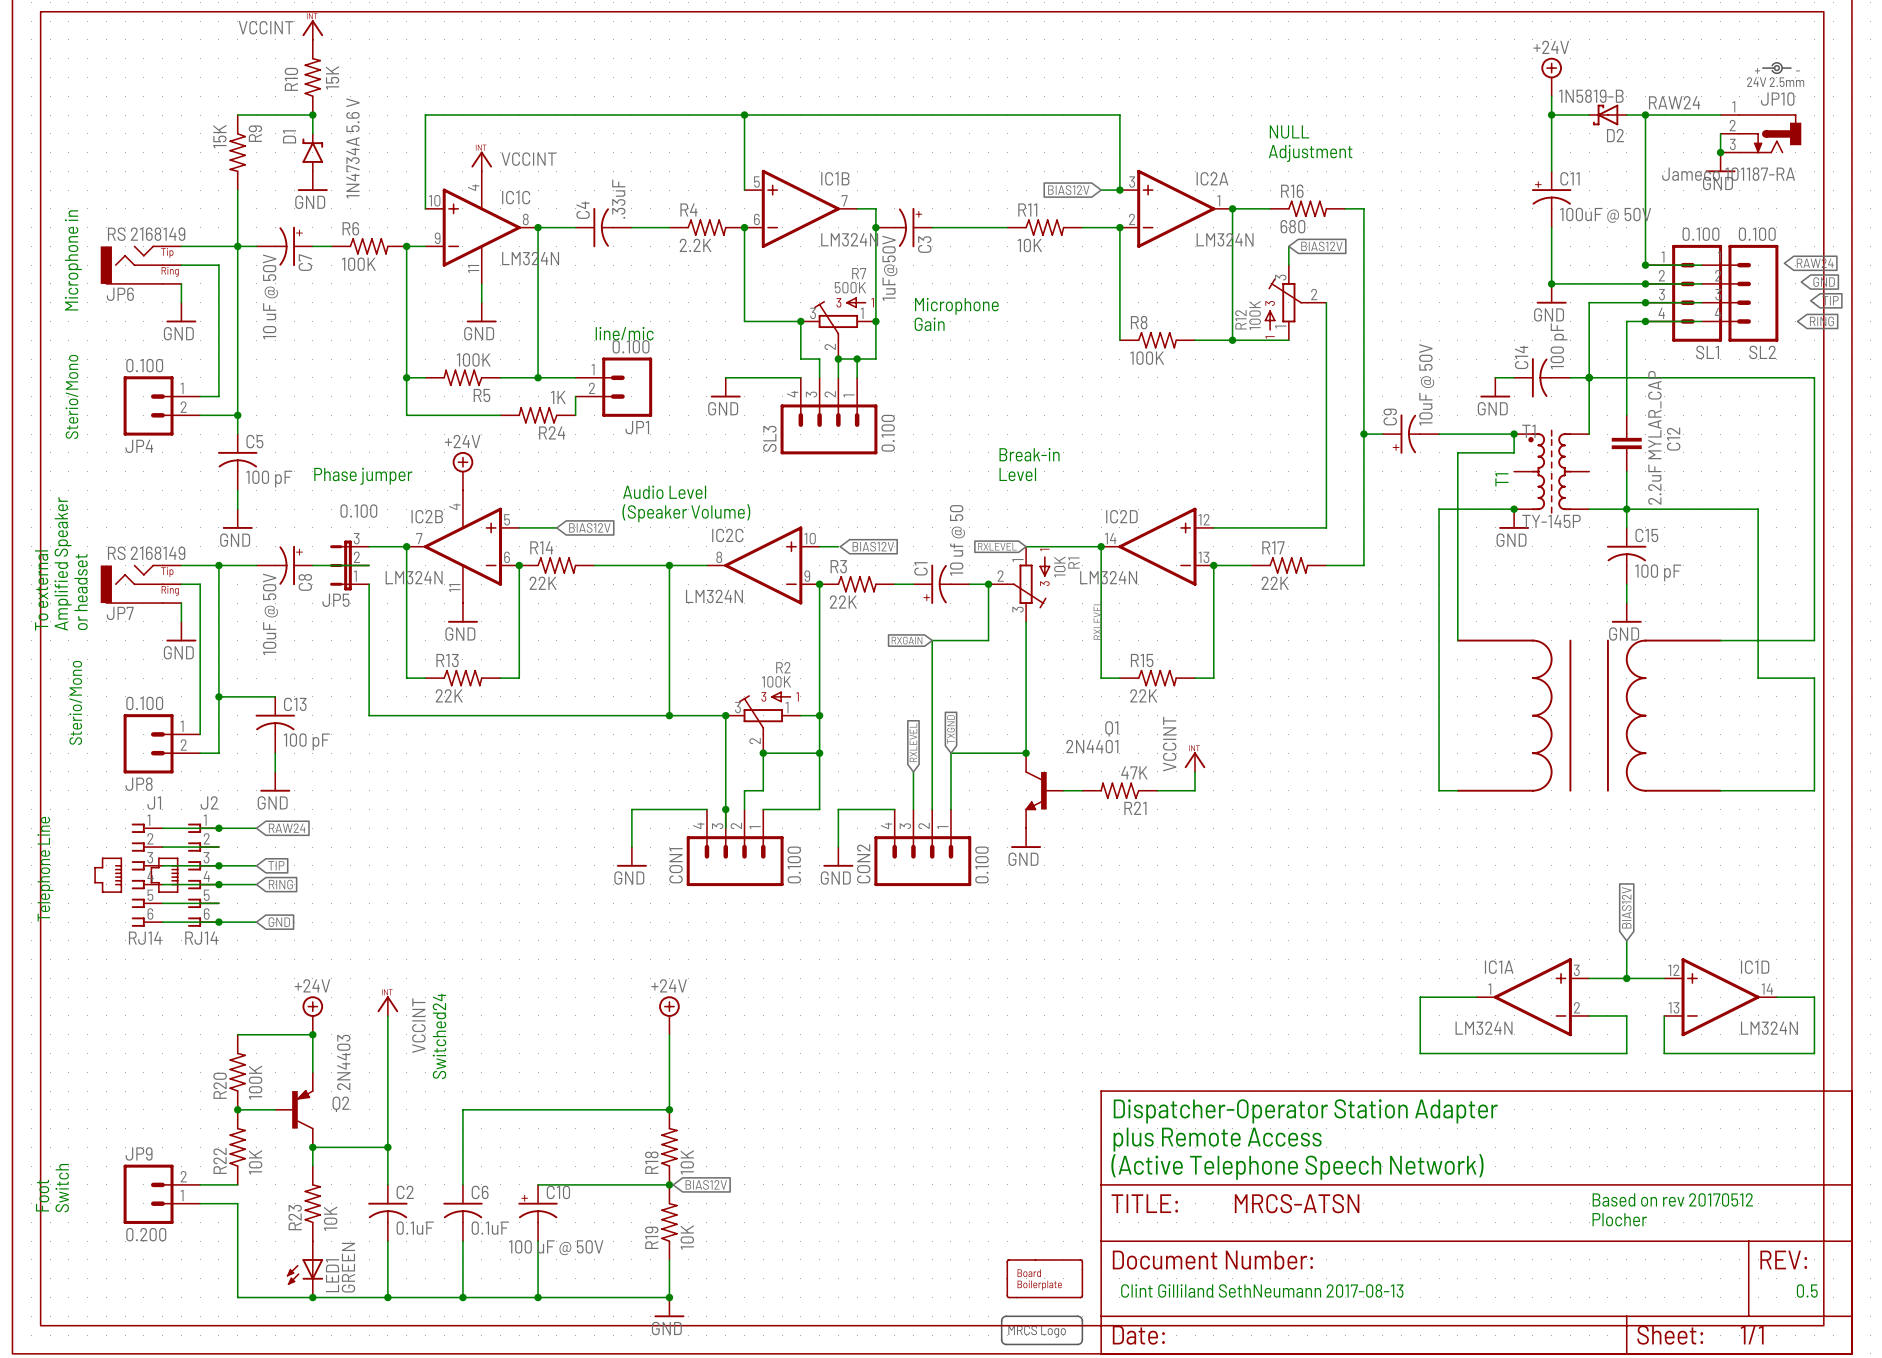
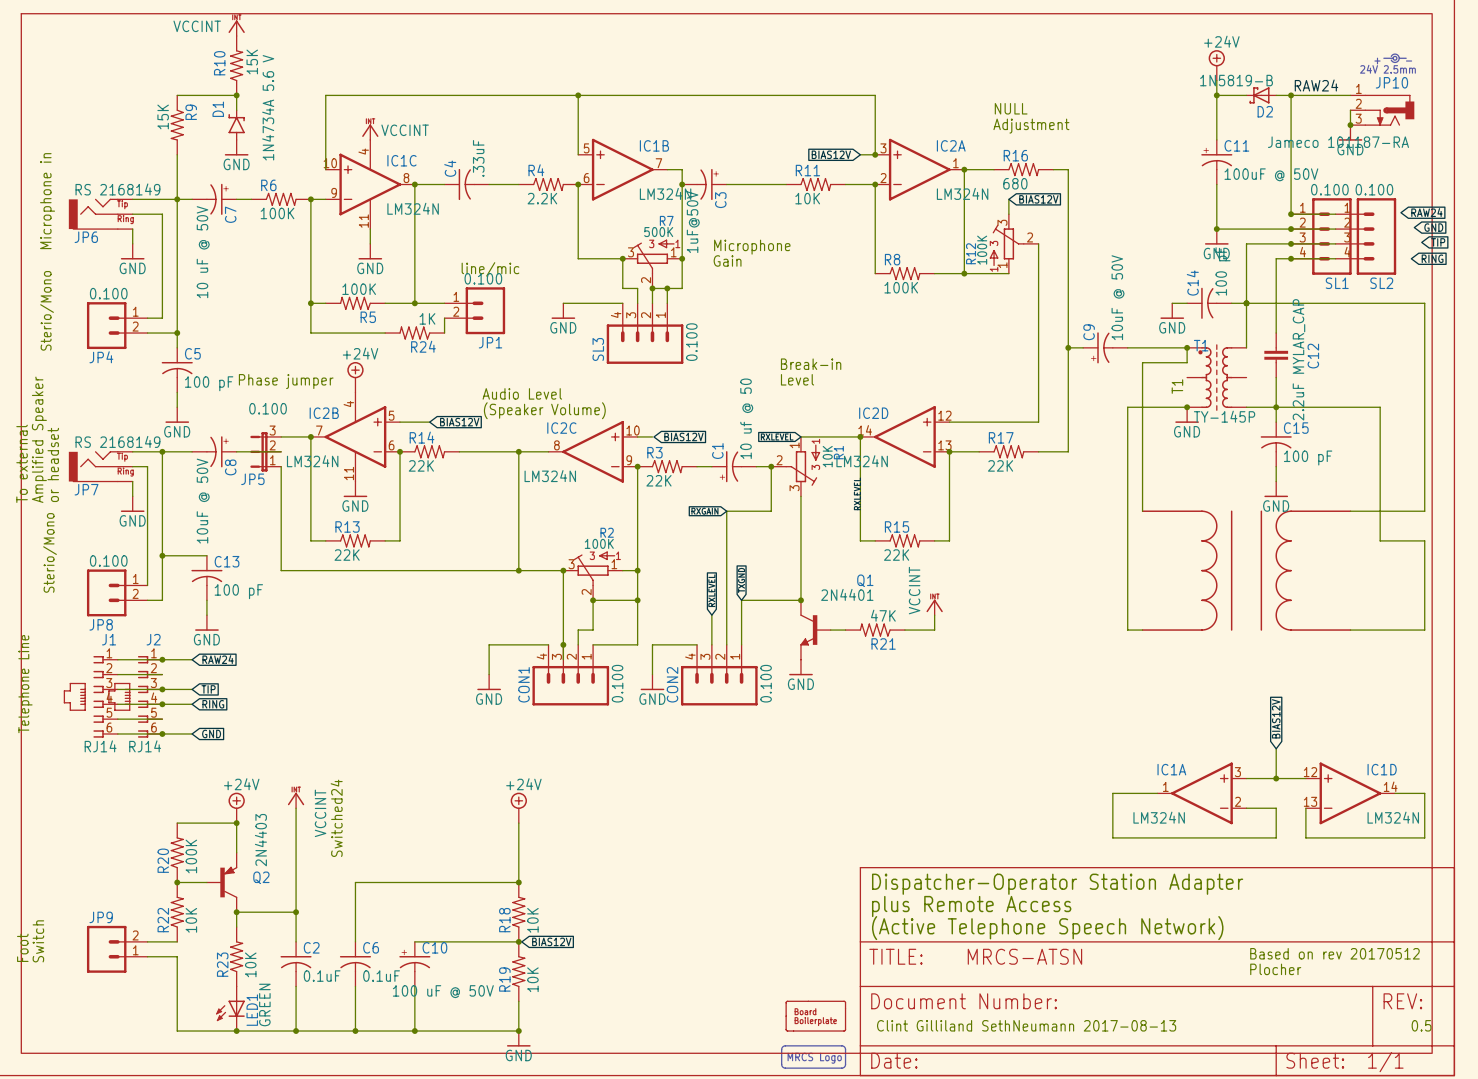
JP9 value: 0.200 (146, 1234) -> none

